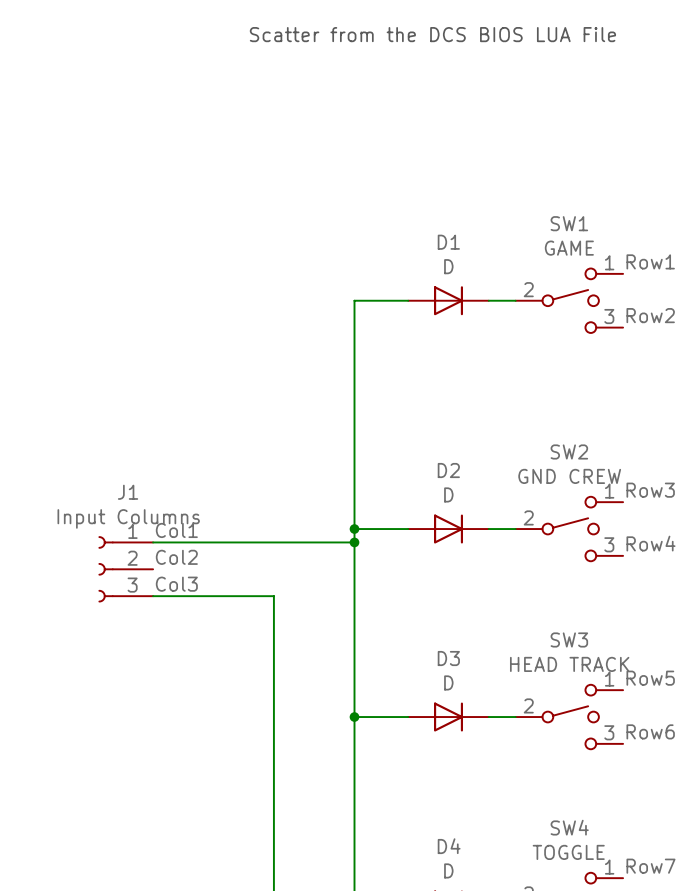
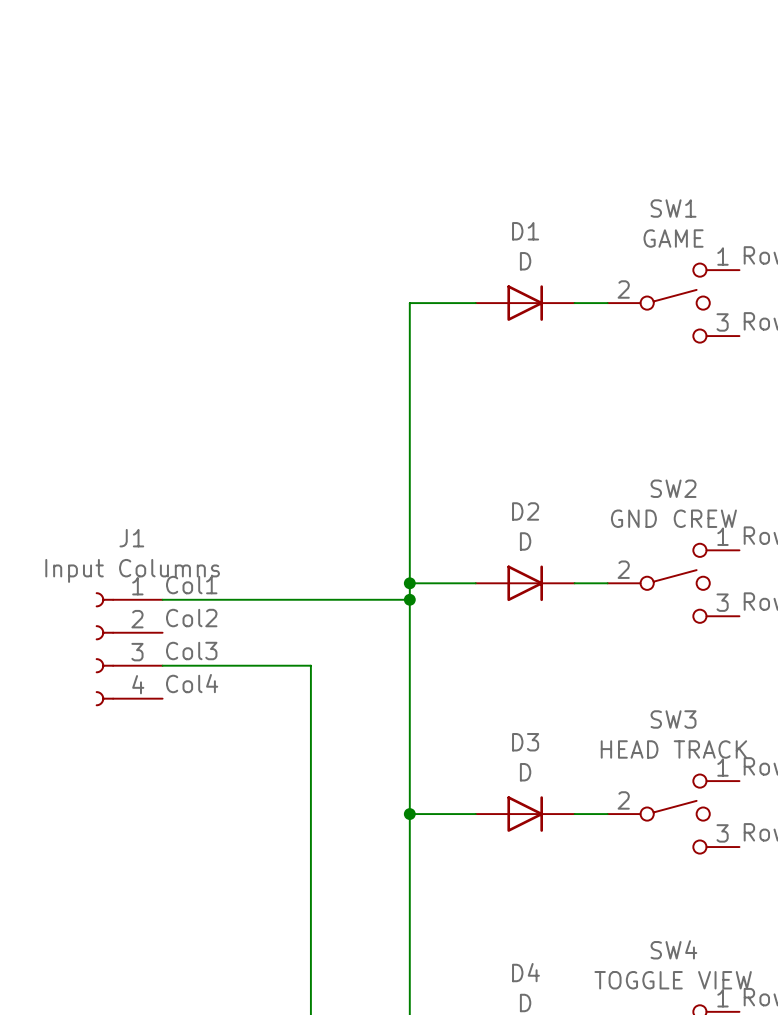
J1 symbol: [98, 536, 154, 603] -> [95, 592, 163, 707]
label: none -> Col4 (192, 683)
SW4 value: TOGGLE (568, 852) -> TOGGLE VIEW (673, 980)

